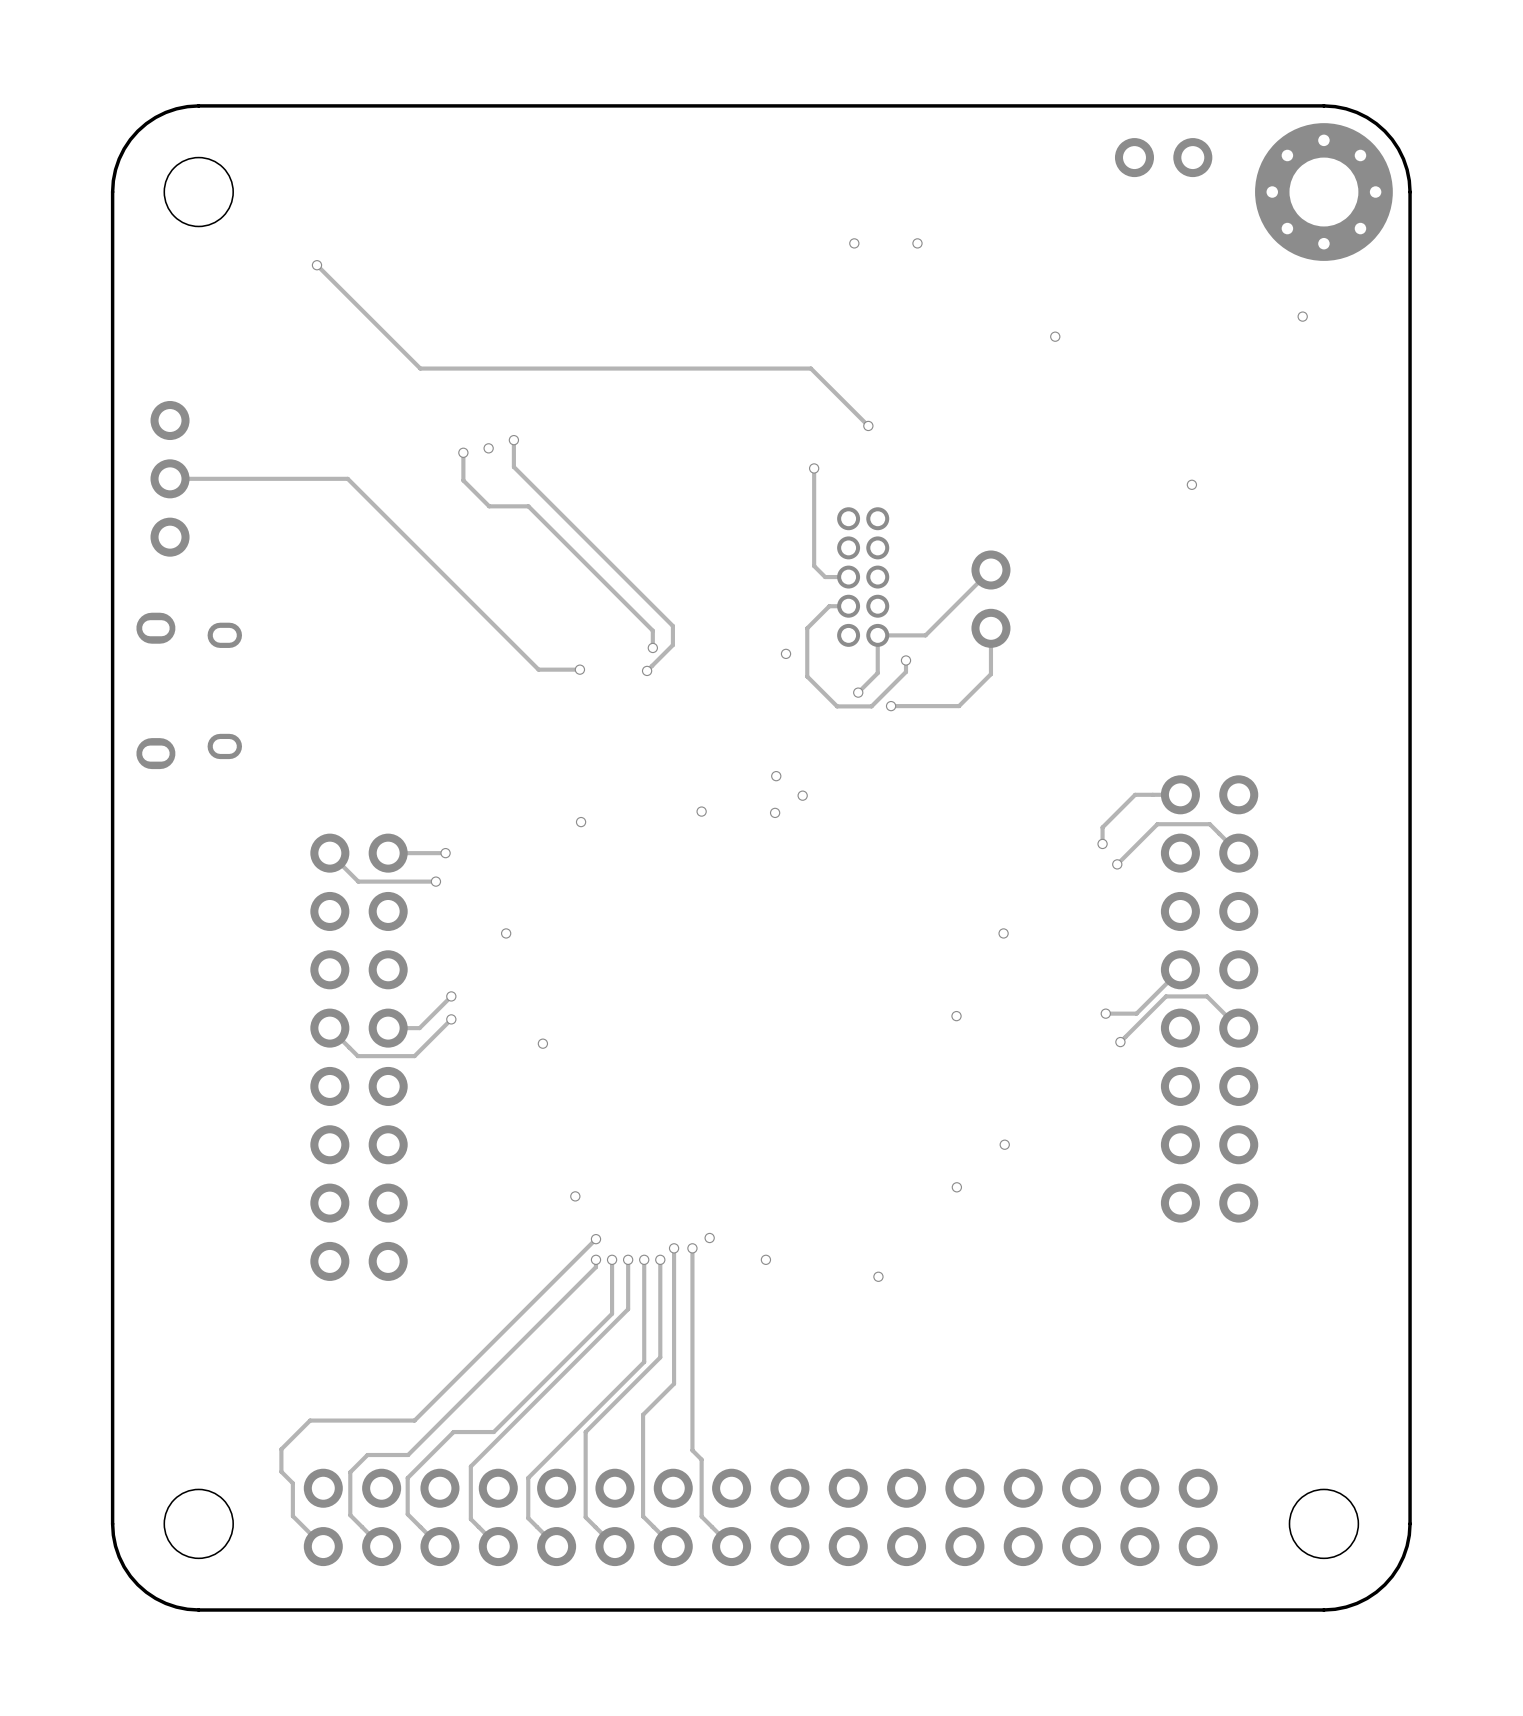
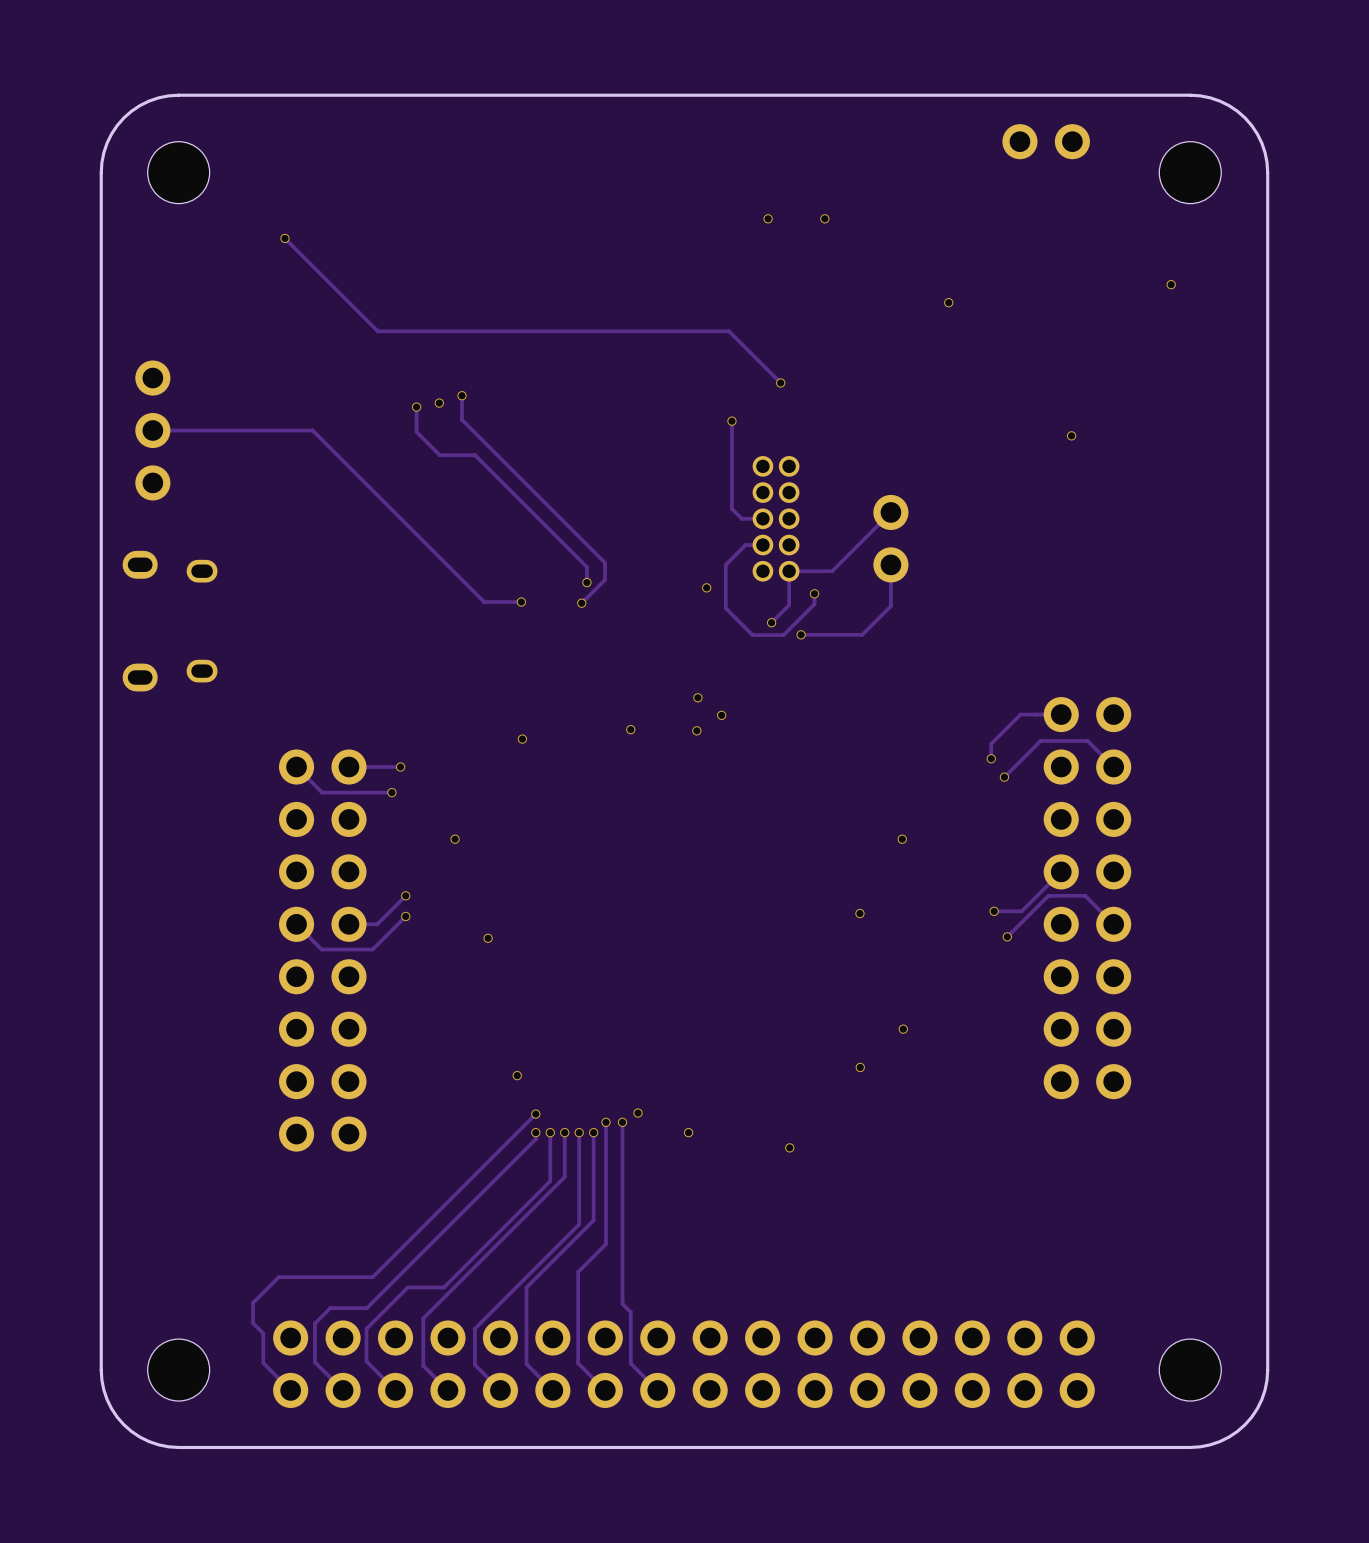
part footprint: [1255, 123, 1393, 261] -> [1159, 141, 1222, 204]

